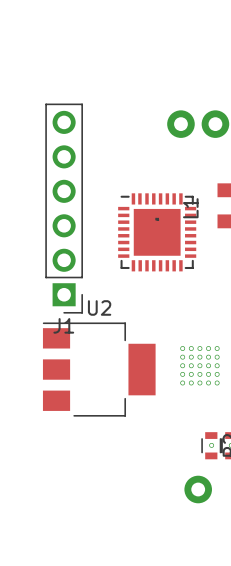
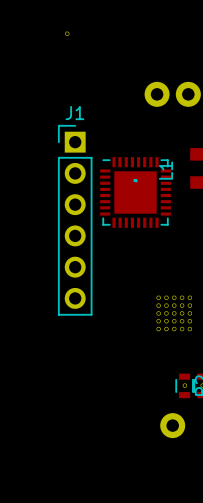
part: none -> (67, 33)
J1 rotation: 0° (64, 208) -> 180° (75, 220)
U2: (99, 369) -> none

